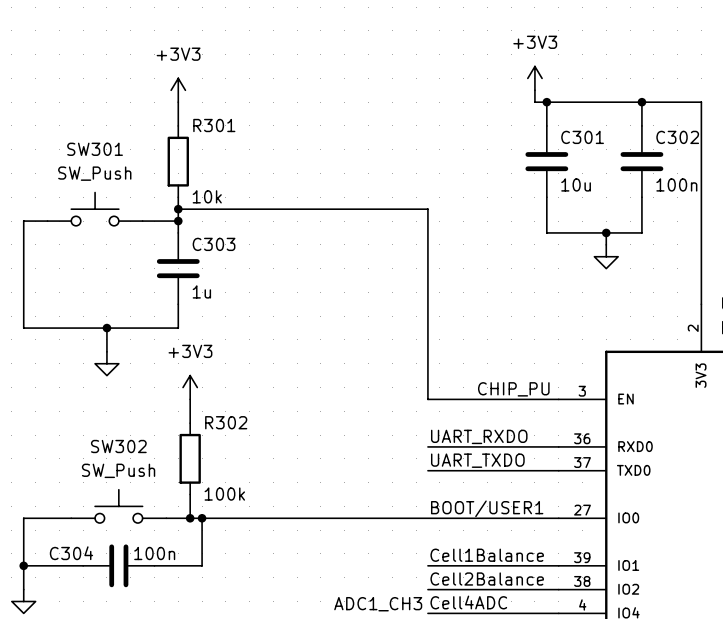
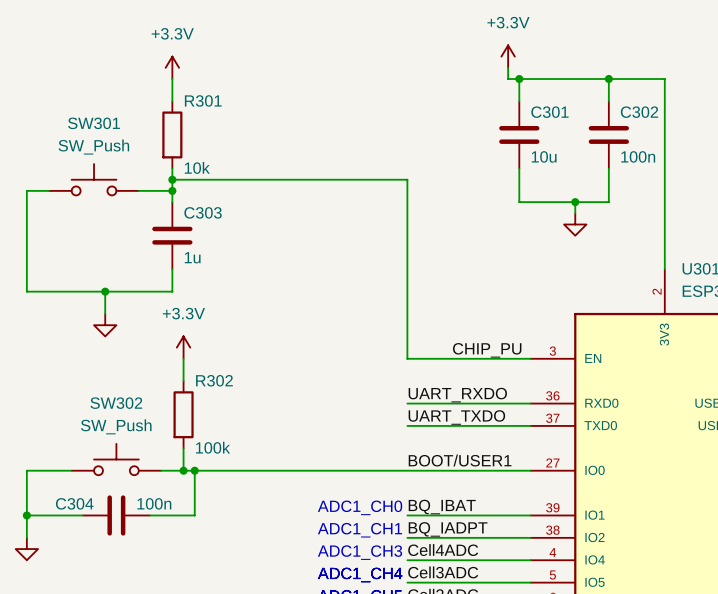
power symbol: +3V3 (534, 78) -> +3.3V (508, 56)
power symbol: +3V3 (178, 90) -> +3.3V (172, 67)
power symbol: +3V3 (190, 387) -> +3.3V (183, 347)
label: Cell1Balance (487, 555) -> BQ_IBAT (442, 507)
text: none -> ADC1_CH0 (360, 507)
label: Cell2Balance (487, 579) -> BQ_IADPT (448, 529)
text: none -> ADC1_CH1 (359, 530)

